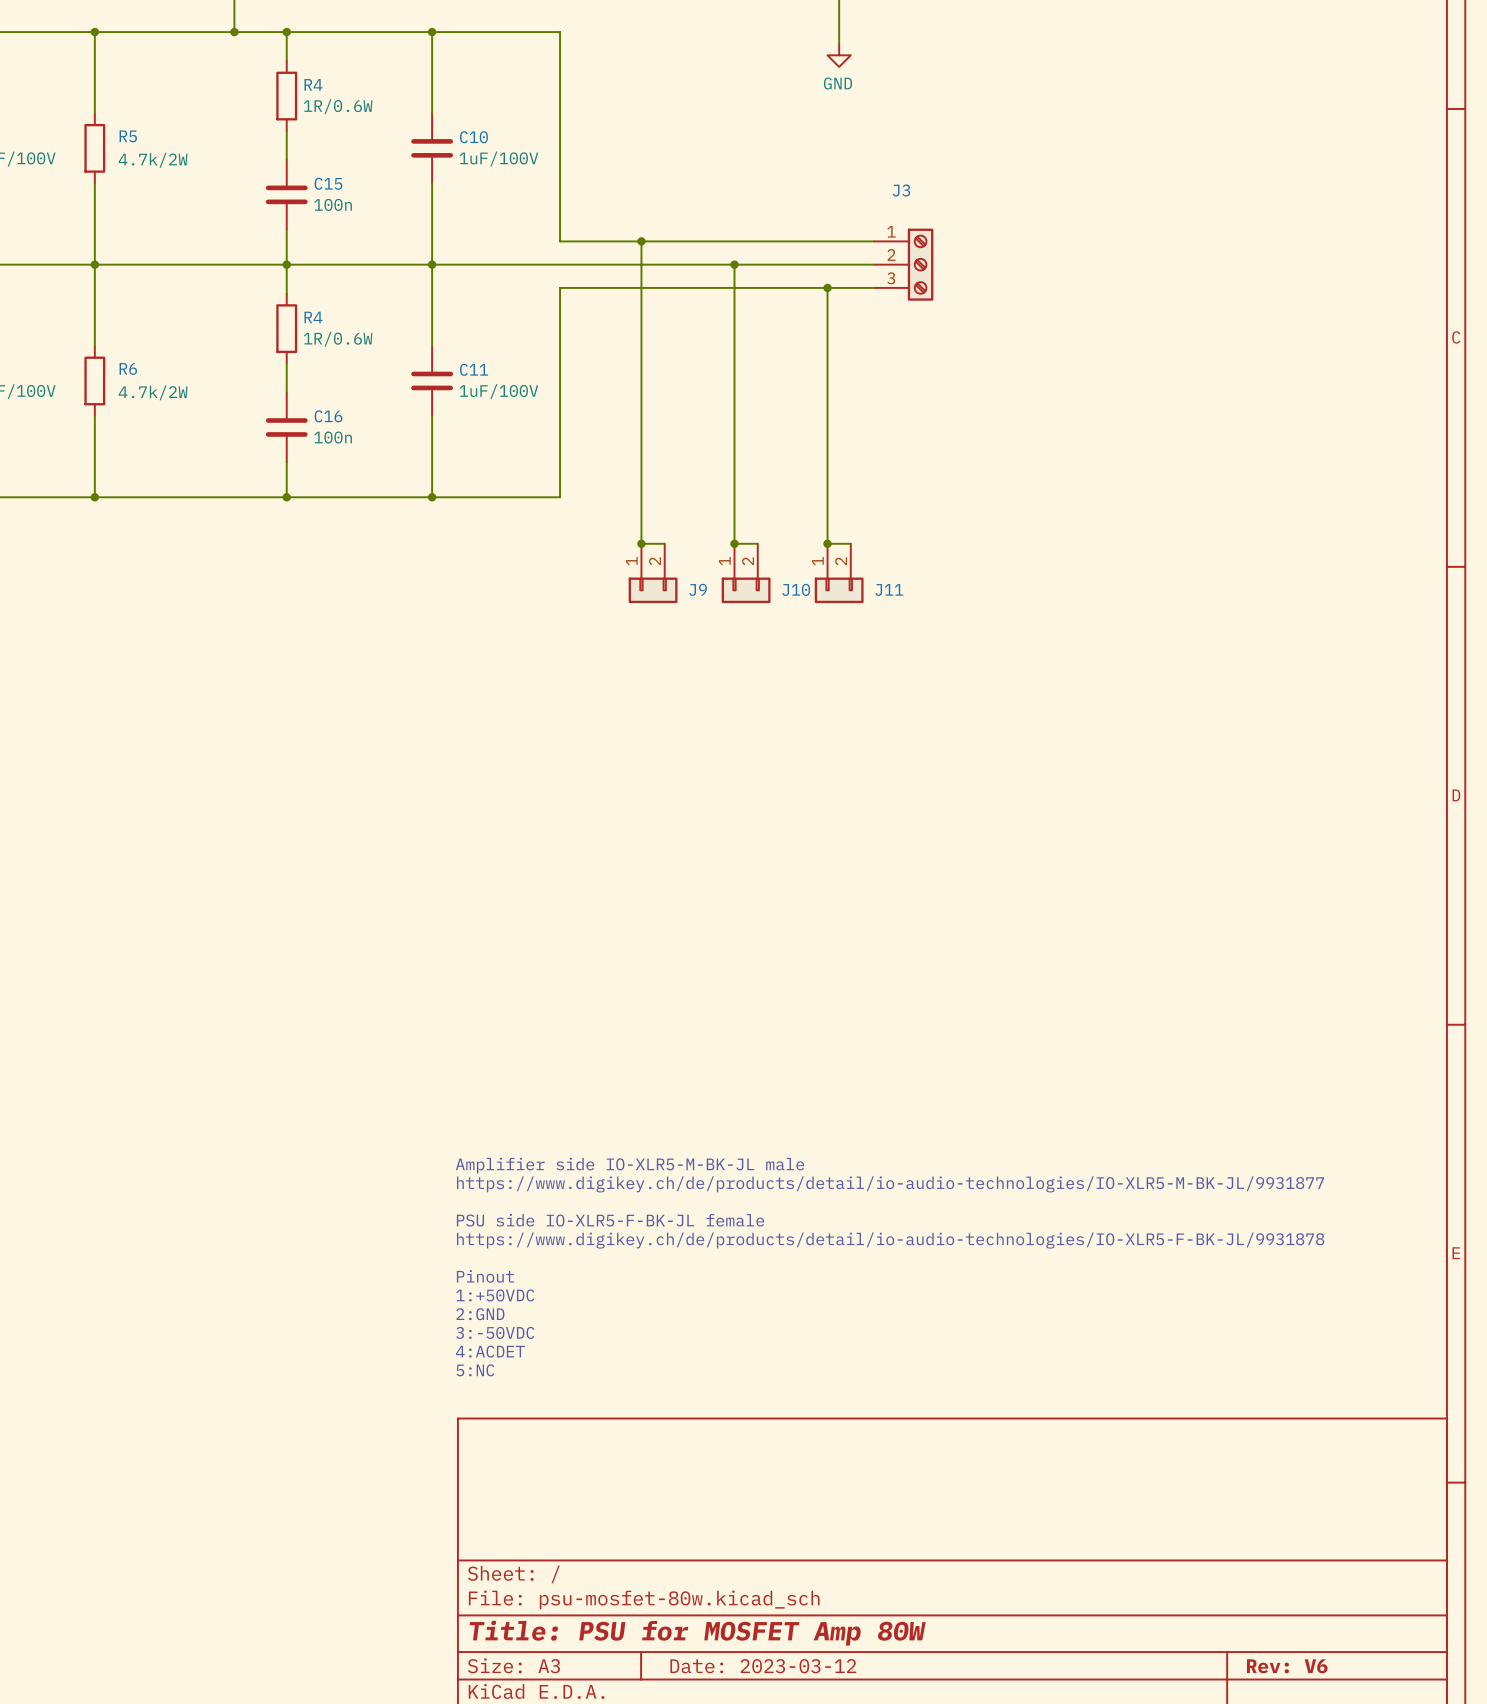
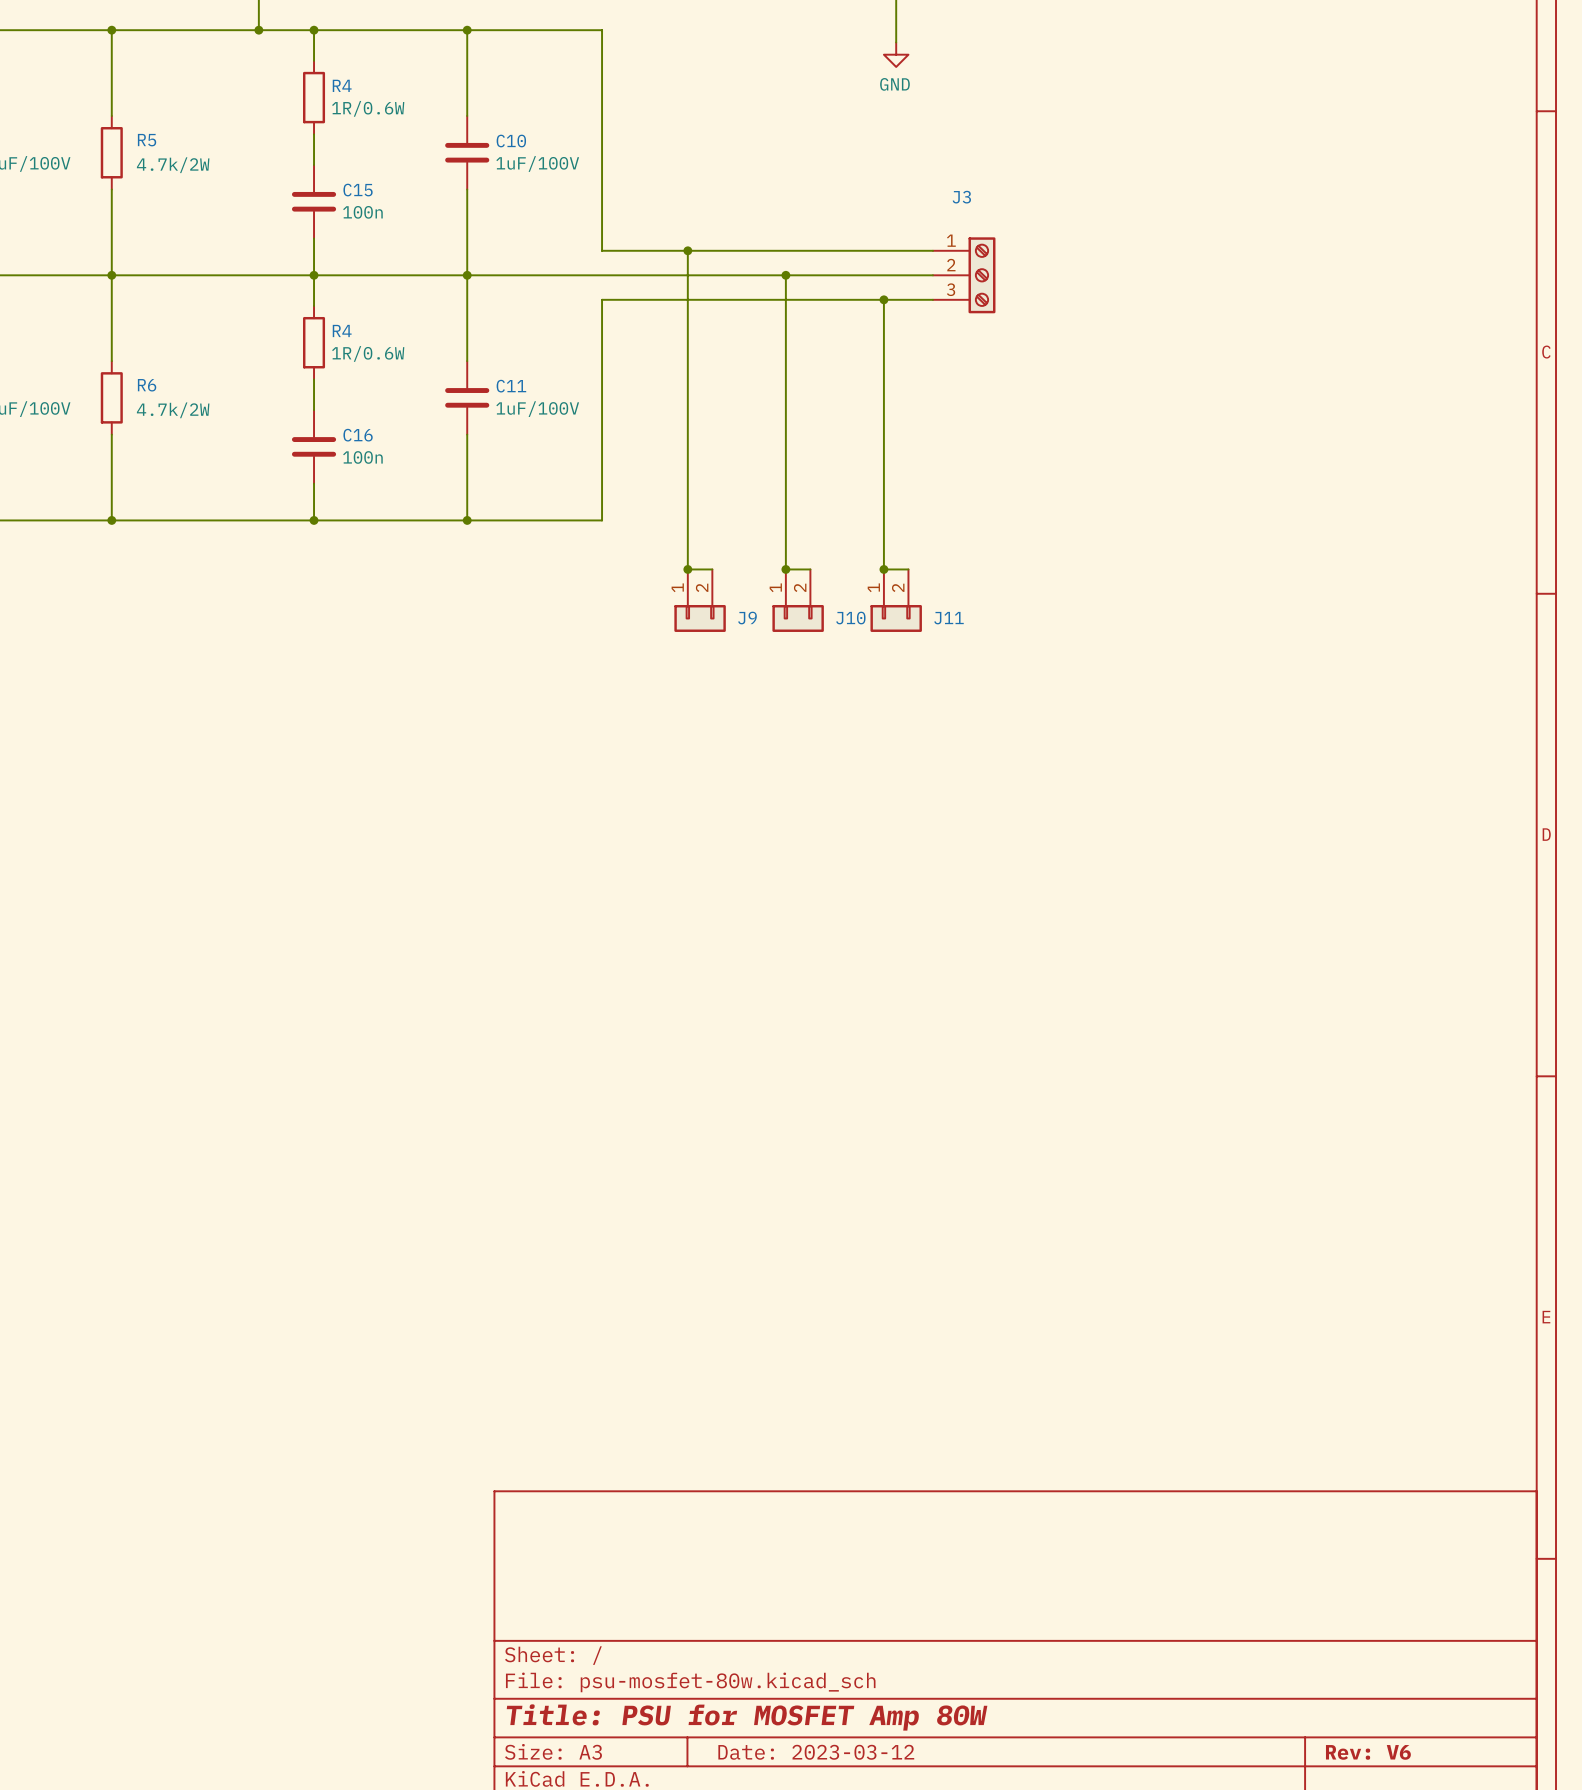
text: Amplifier side IO-XLR5-M-BK-JL male (630, 1165) -> none
text: https://www.digikey.ch/de/products/detail/io-audio-technologies/IO-XLR5-M-BK-JL/9931877 (890, 1184) -> none
text: PSU side IO-XLR5-F-BK-JL female (610, 1220) -> none
text: https://www.digikey.ch/de/products/detail/io-audio-technologies/IO-XLR5-F-BK-JL/9931878 (890, 1240) -> none
text: Pinout (485, 1276) -> none
text: 1:+50VDC (495, 1295) -> none
text: 2:GND (480, 1314) -> none
text: 3:-50VDC (495, 1332) -> none
text: 4:ACDET (490, 1351) -> none
text: 5:NC (475, 1370) -> none

